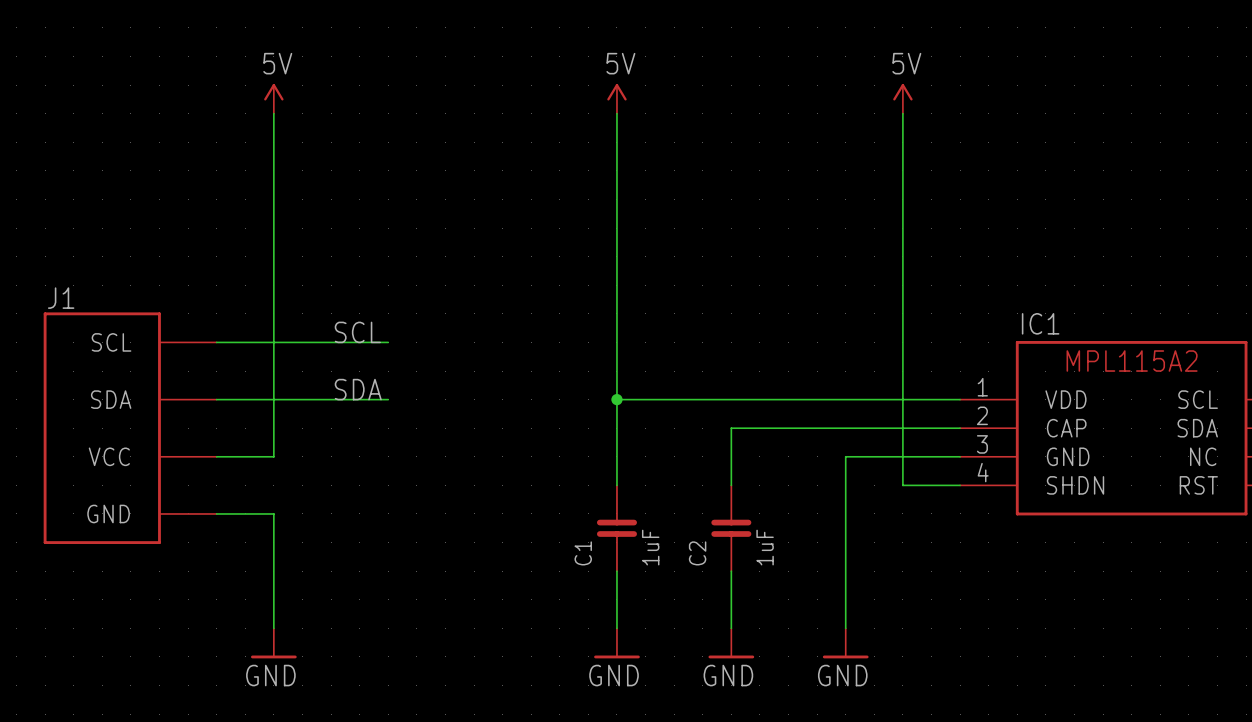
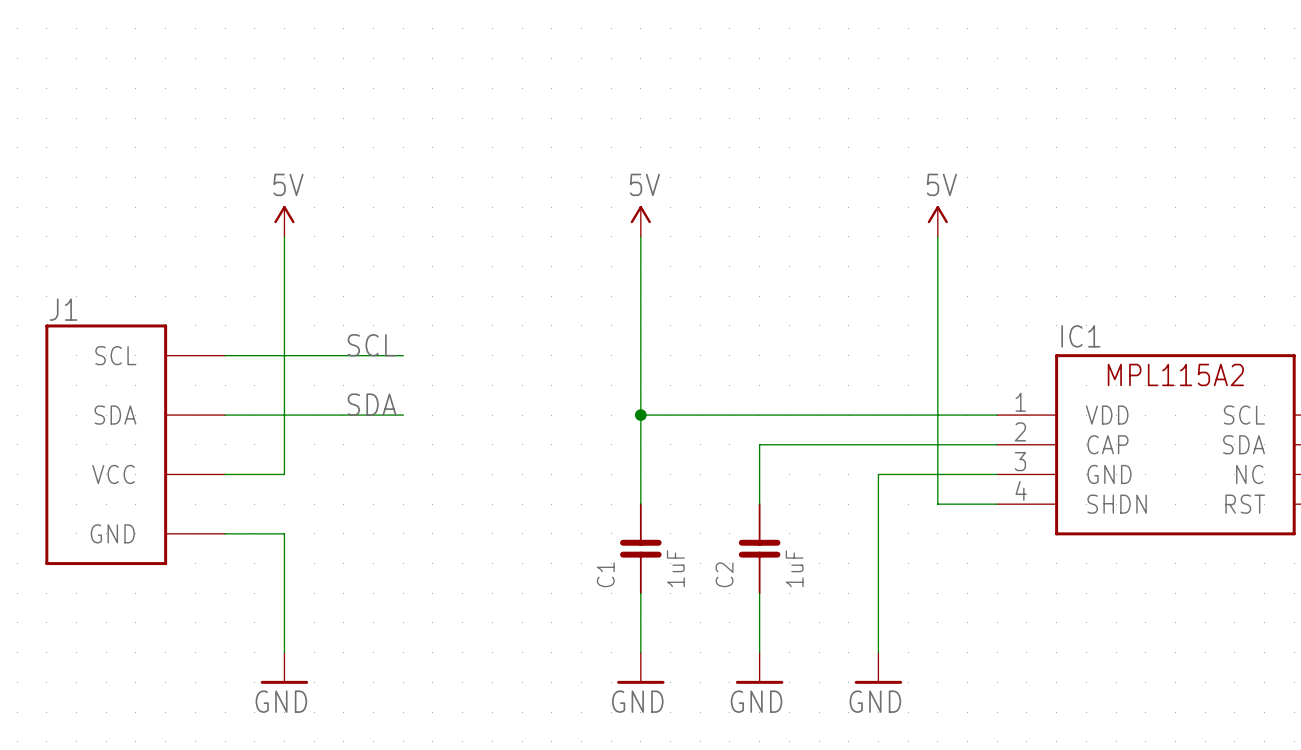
power symbol position: 5V (273, 98) -> 5V (284, 221)
power symbol position: 5V (616, 98) -> 5V (640, 221)
power symbol position: 5V (902, 98) -> 5V (937, 221)
wire: (273, 113) (273, 228) -> none
wire: (616, 113) (616, 228) -> none
wire: (902, 113) (902, 228) -> none

